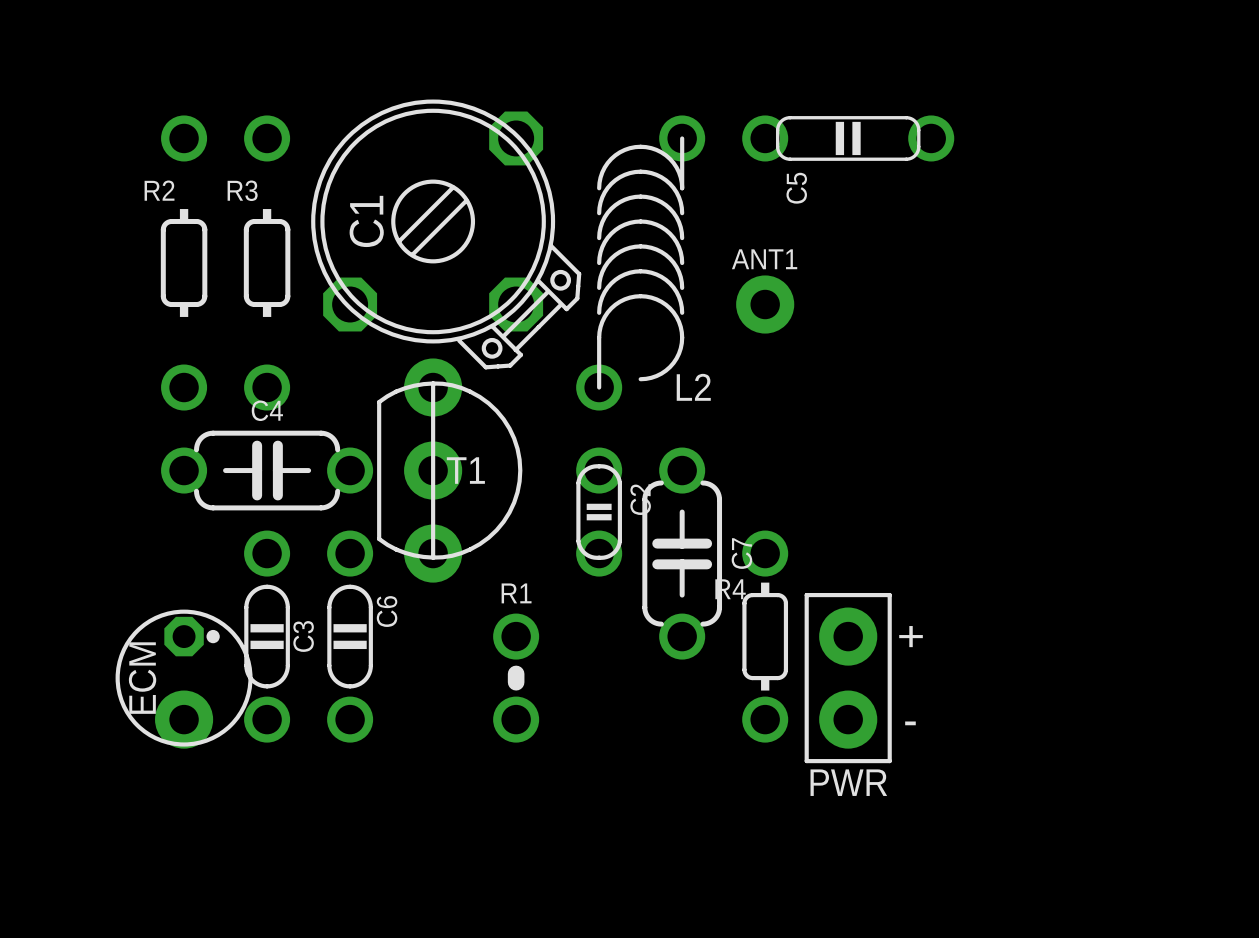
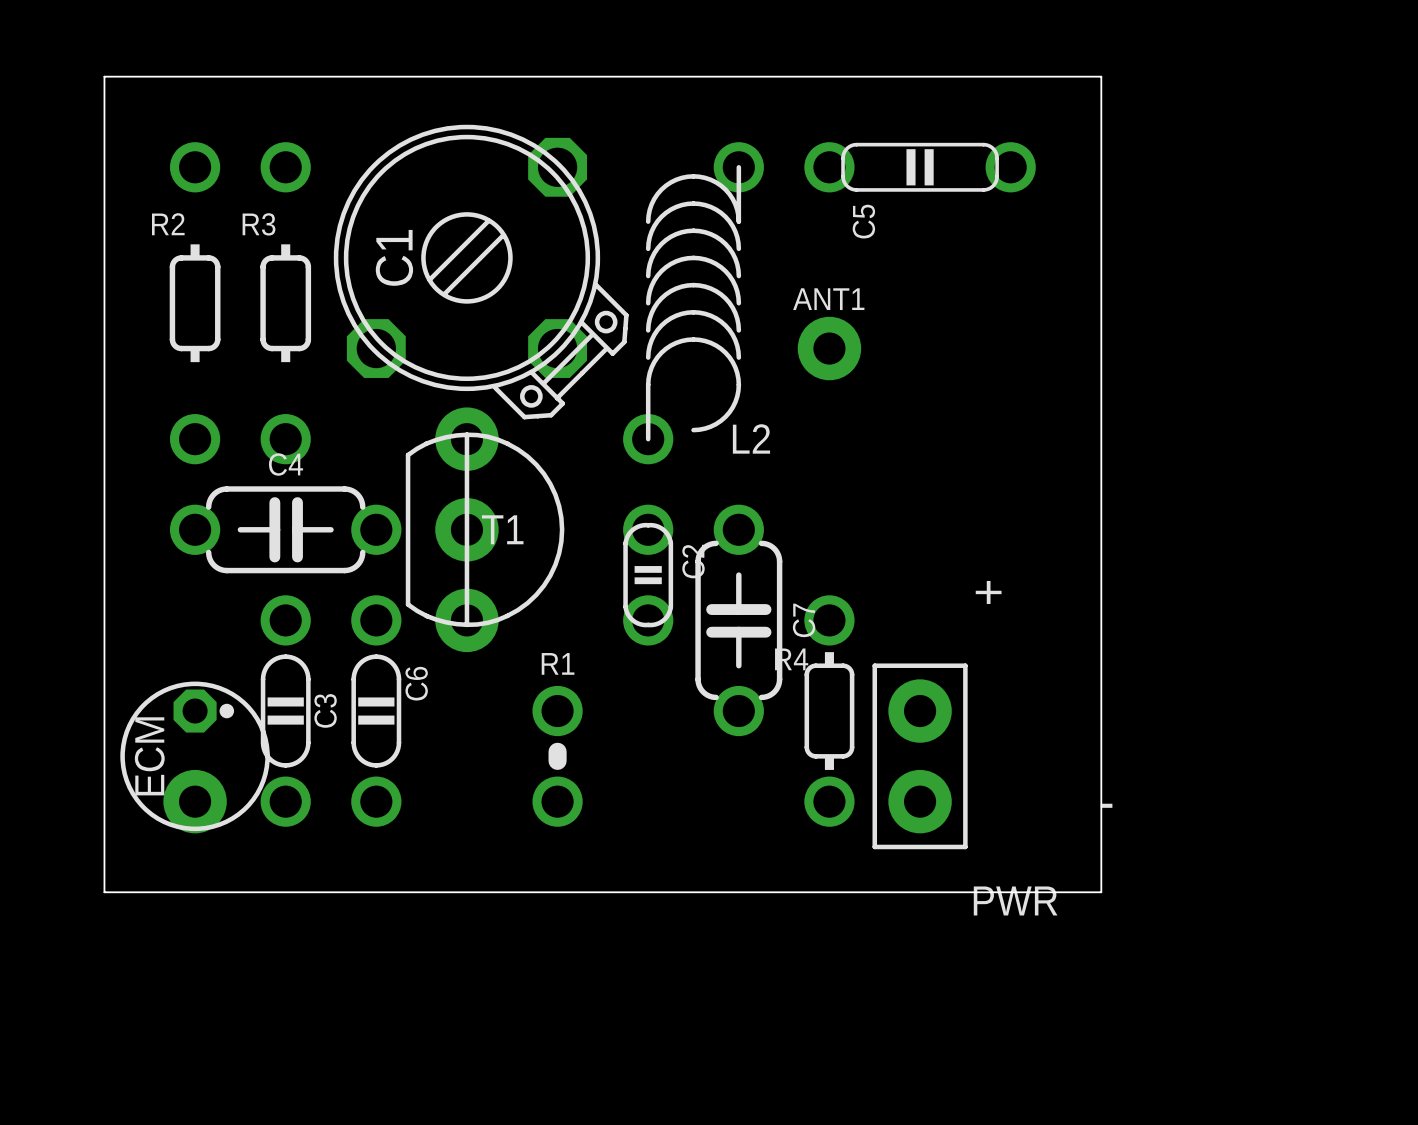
board edge: none -> (104, 76) (1101, 76) (1101, 892) (104, 892) (104, 76)
part footprint: [804, 592, 892, 764] -> [872, 663, 968, 850]

